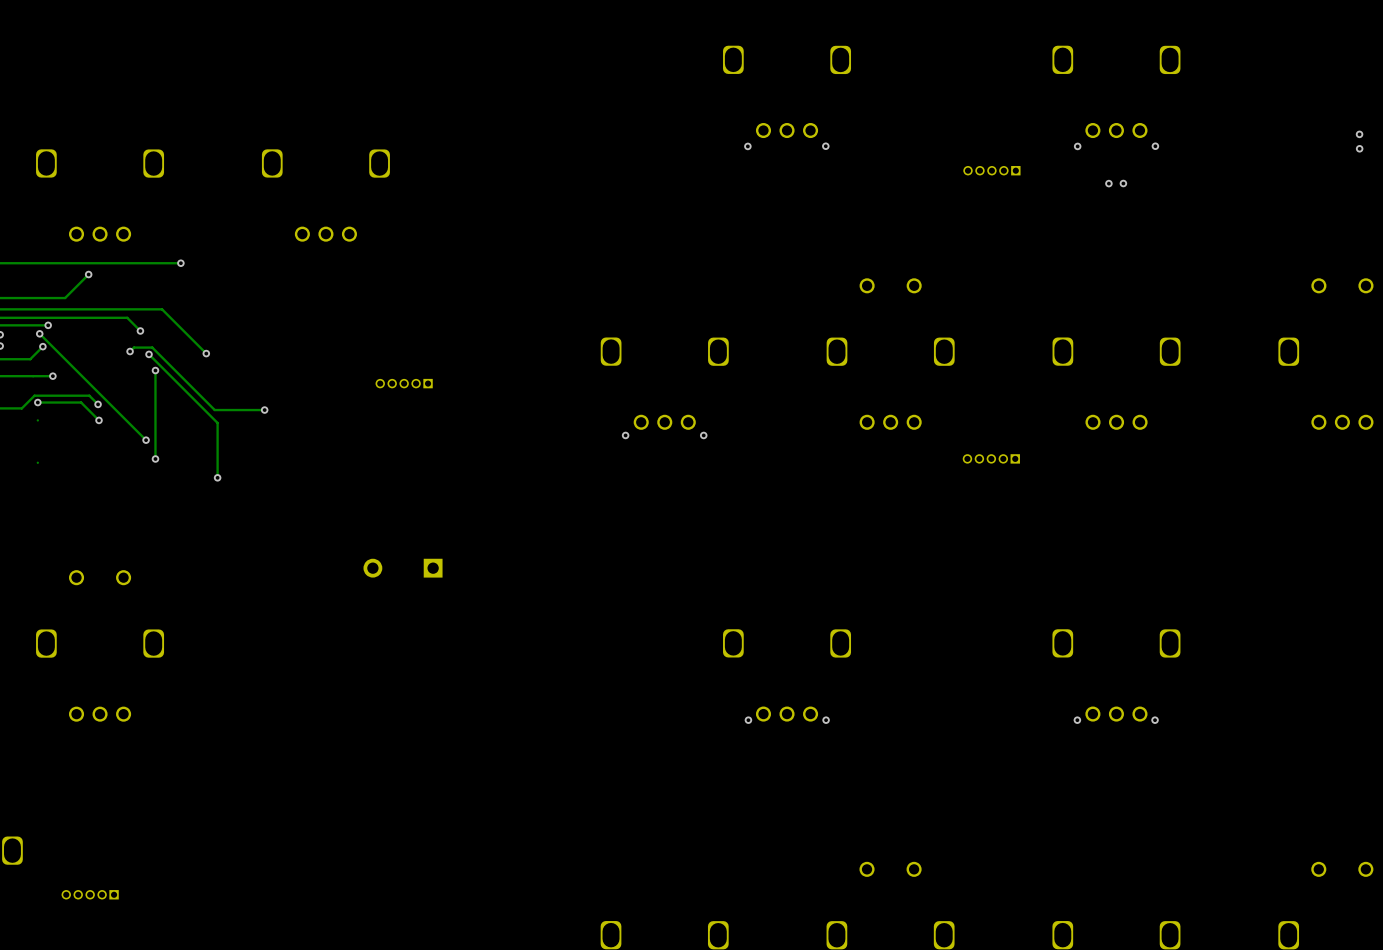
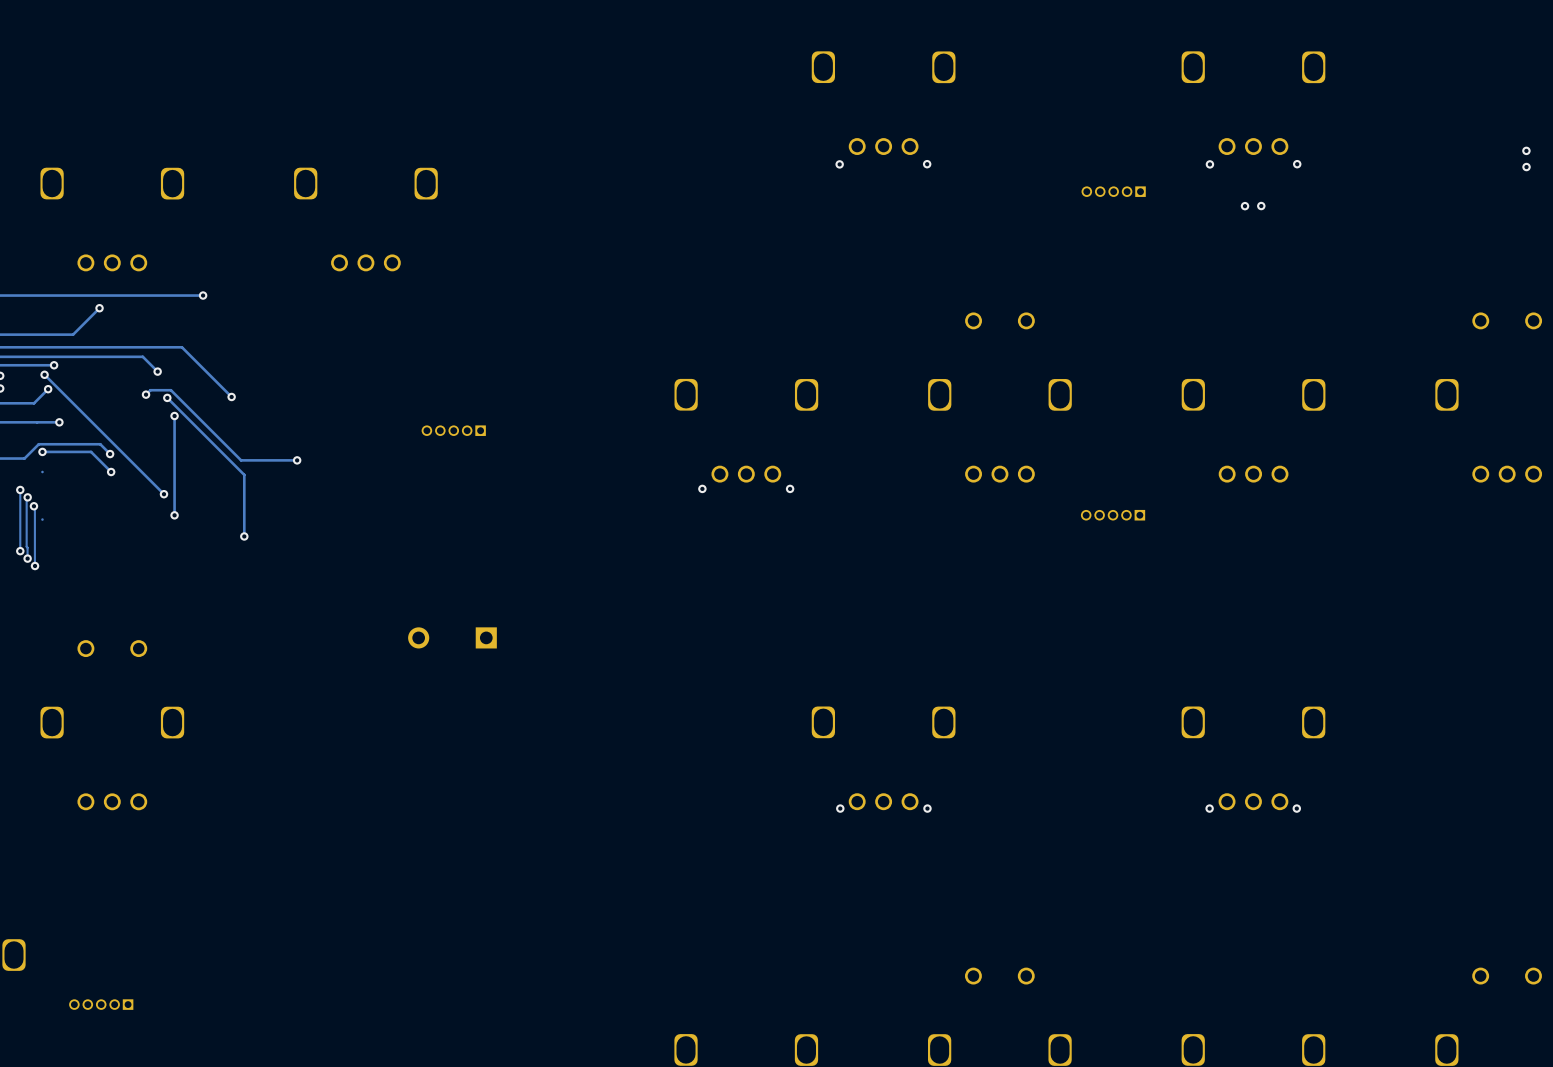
track: none -> (20, 489) (20, 551)
via: none -> (20, 489)
track: none -> (27, 497) (27, 558)
via: none -> (27, 497)
track: none -> (33, 506) (34, 565)
via: none -> (33, 506)
via: none -> (20, 551)
via: none -> (27, 558)
via: none -> (35, 566)

